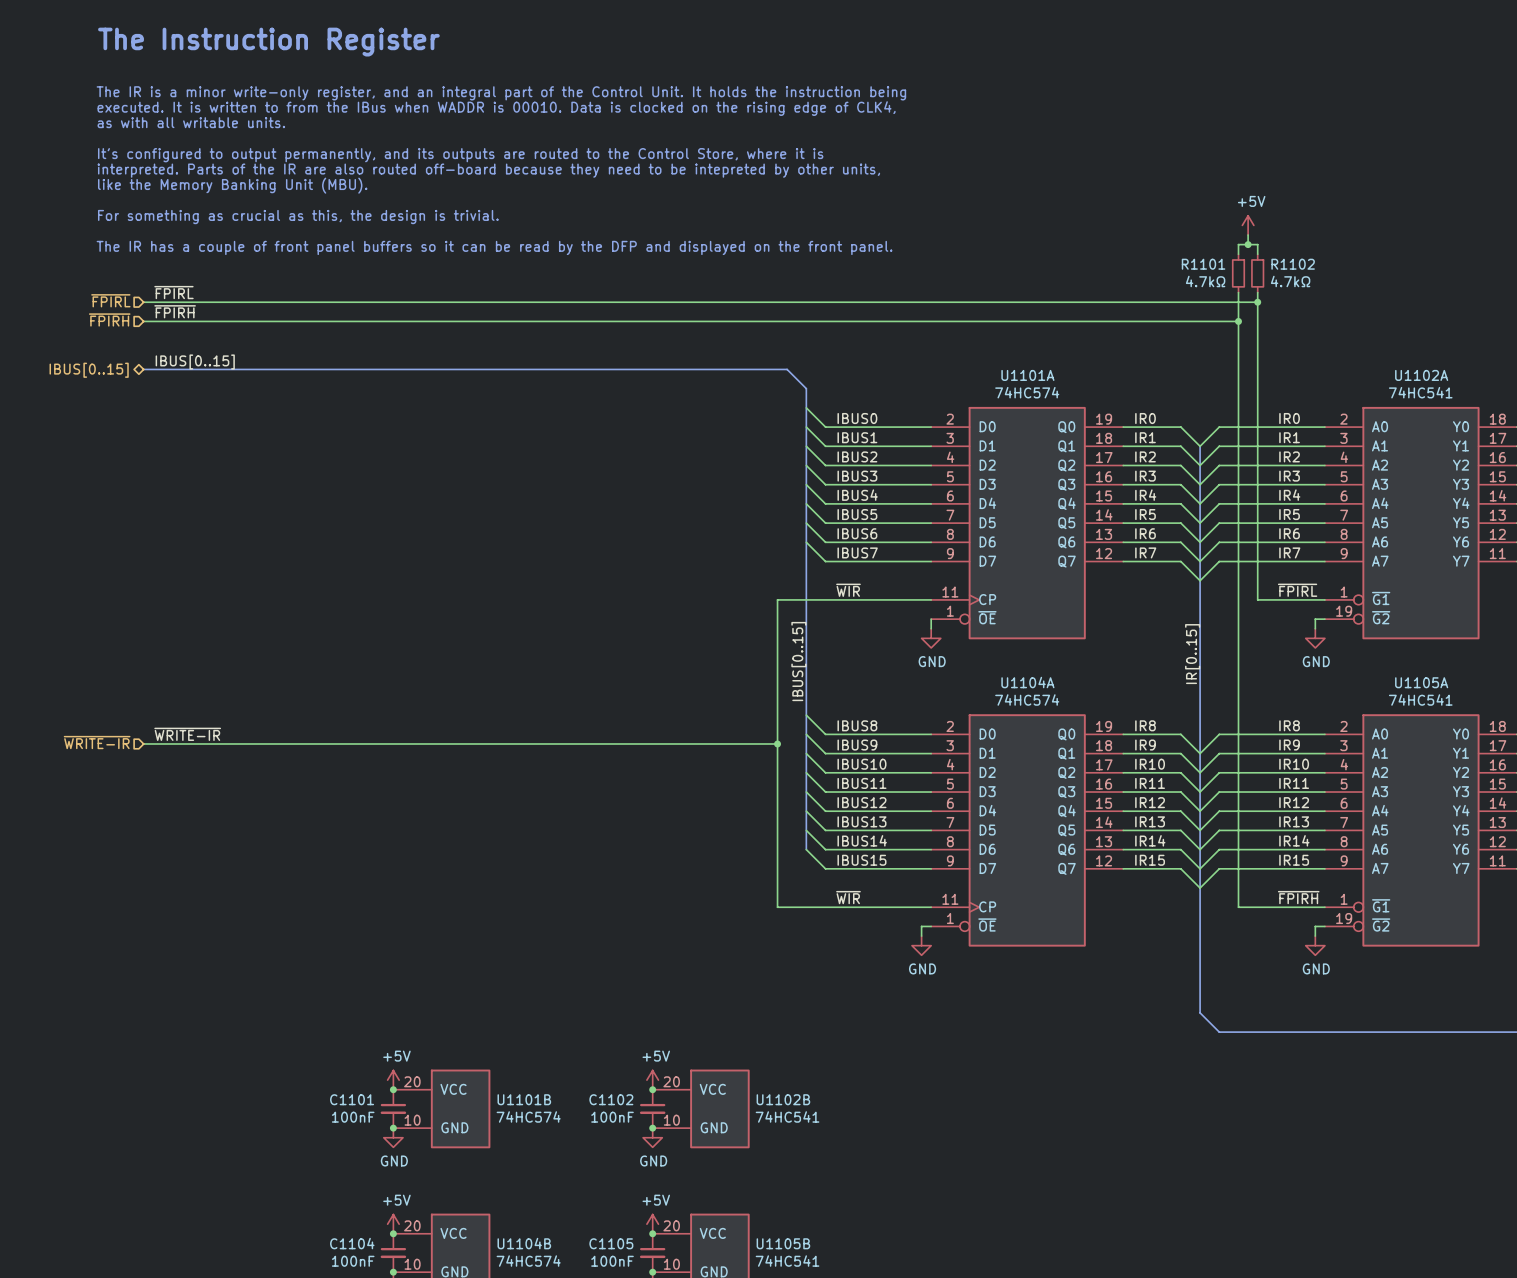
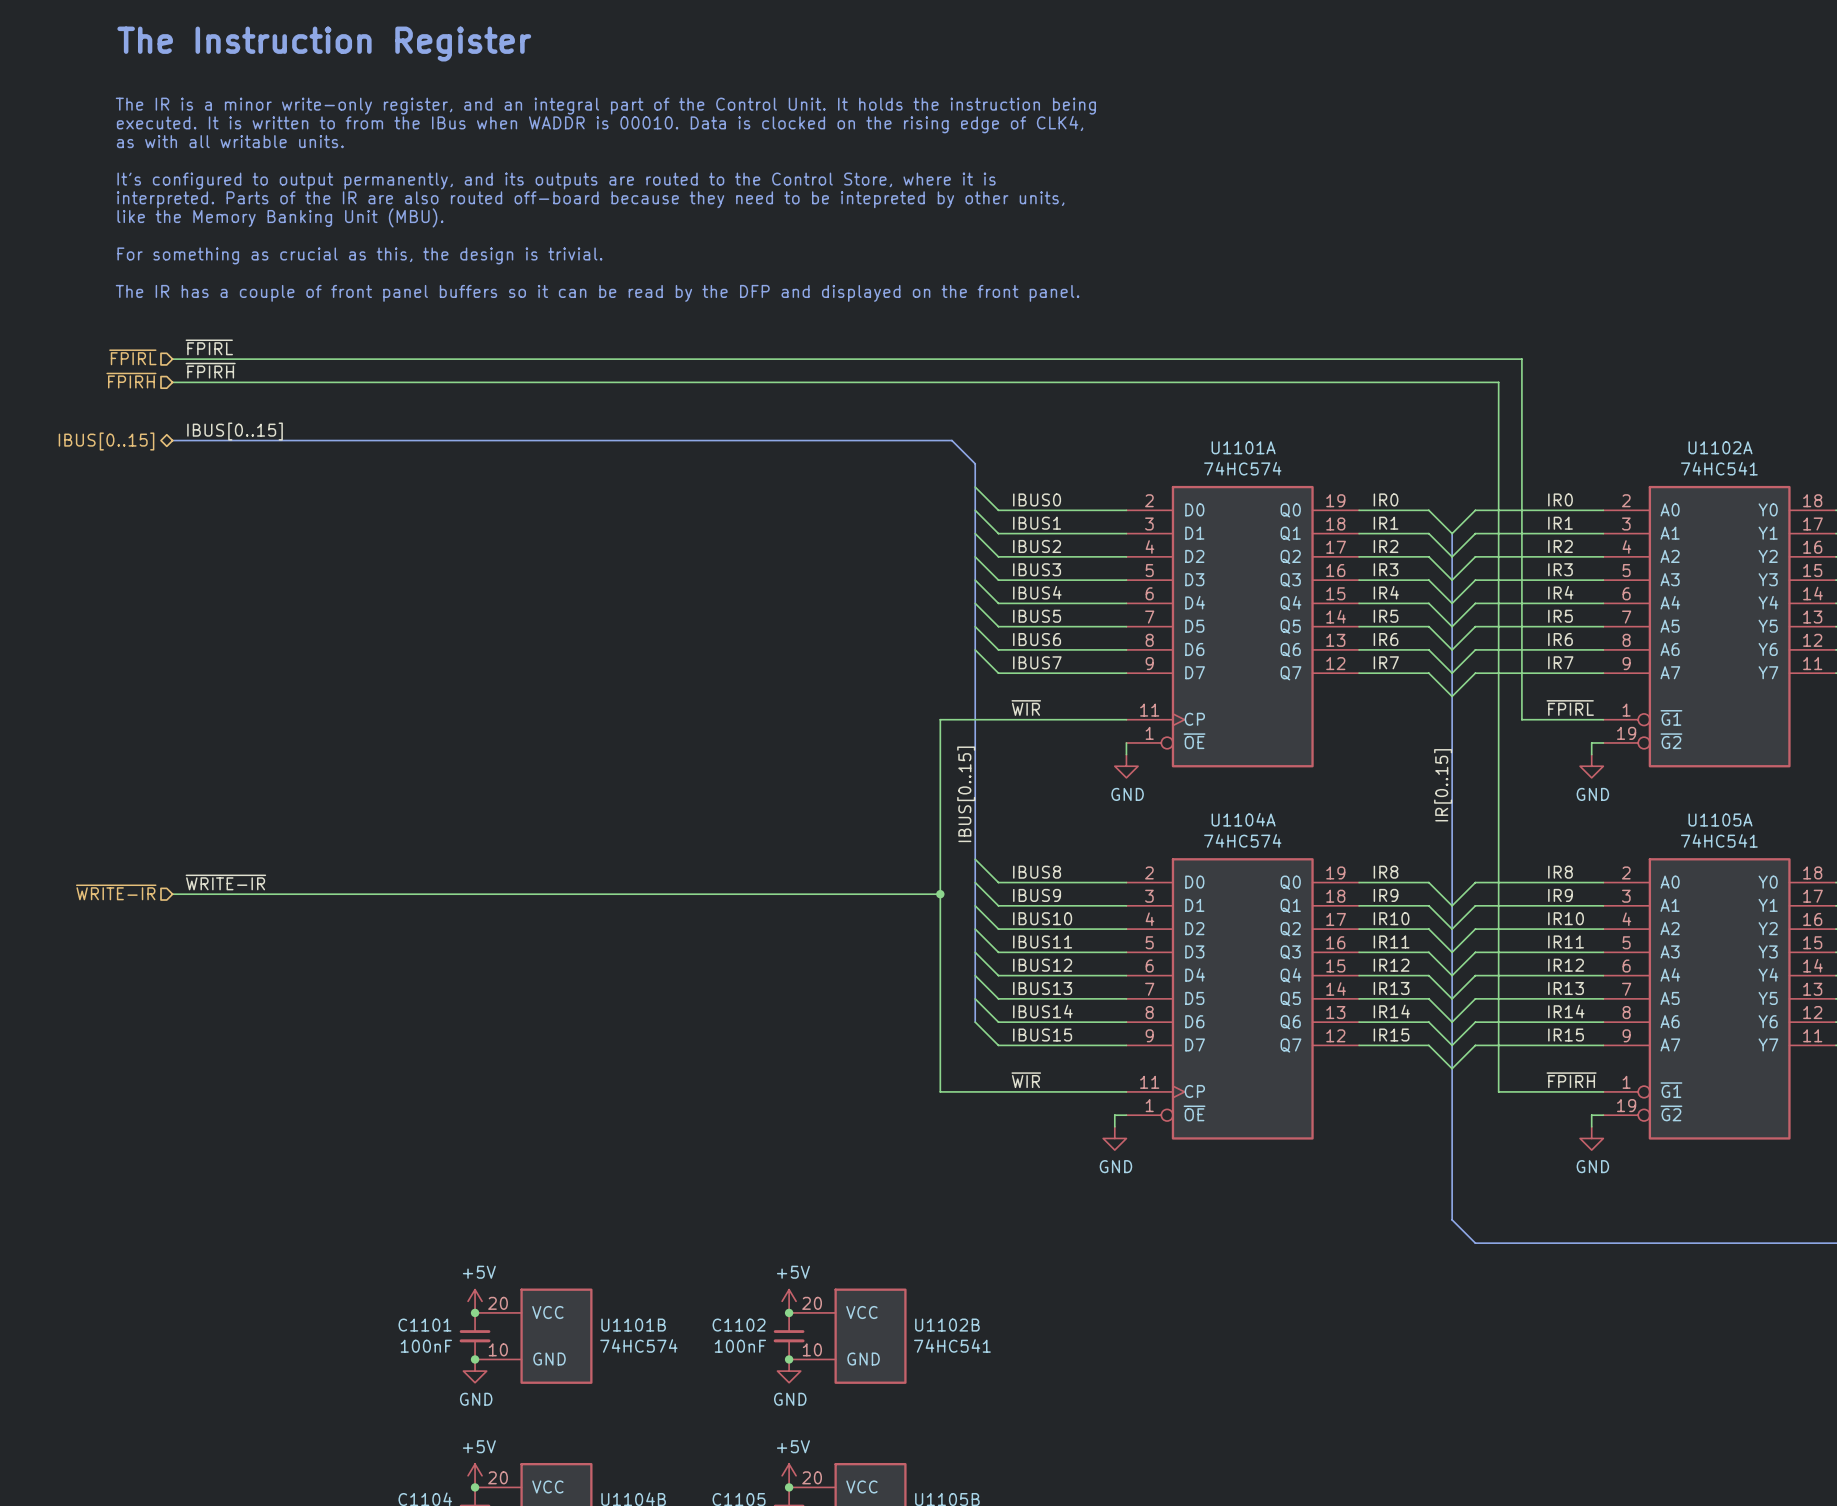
power symbol: +5V (1248, 225) -> none
wire: (1248, 235) (1248, 244) -> none
junction: (1248, 244) -> none
wire: (1238, 254) (1238, 244) (1257, 244) (1257, 254) -> none
R1101: 4.7kΩ (1238, 273) -> none
R1102: 4.7kΩ (1257, 273) -> none
wire: (1238, 292) (1238, 321) -> none
wire: (1257, 292) (1257, 302) -> none
junction: (1257, 302) -> none
junction: (1238, 321) -> none

